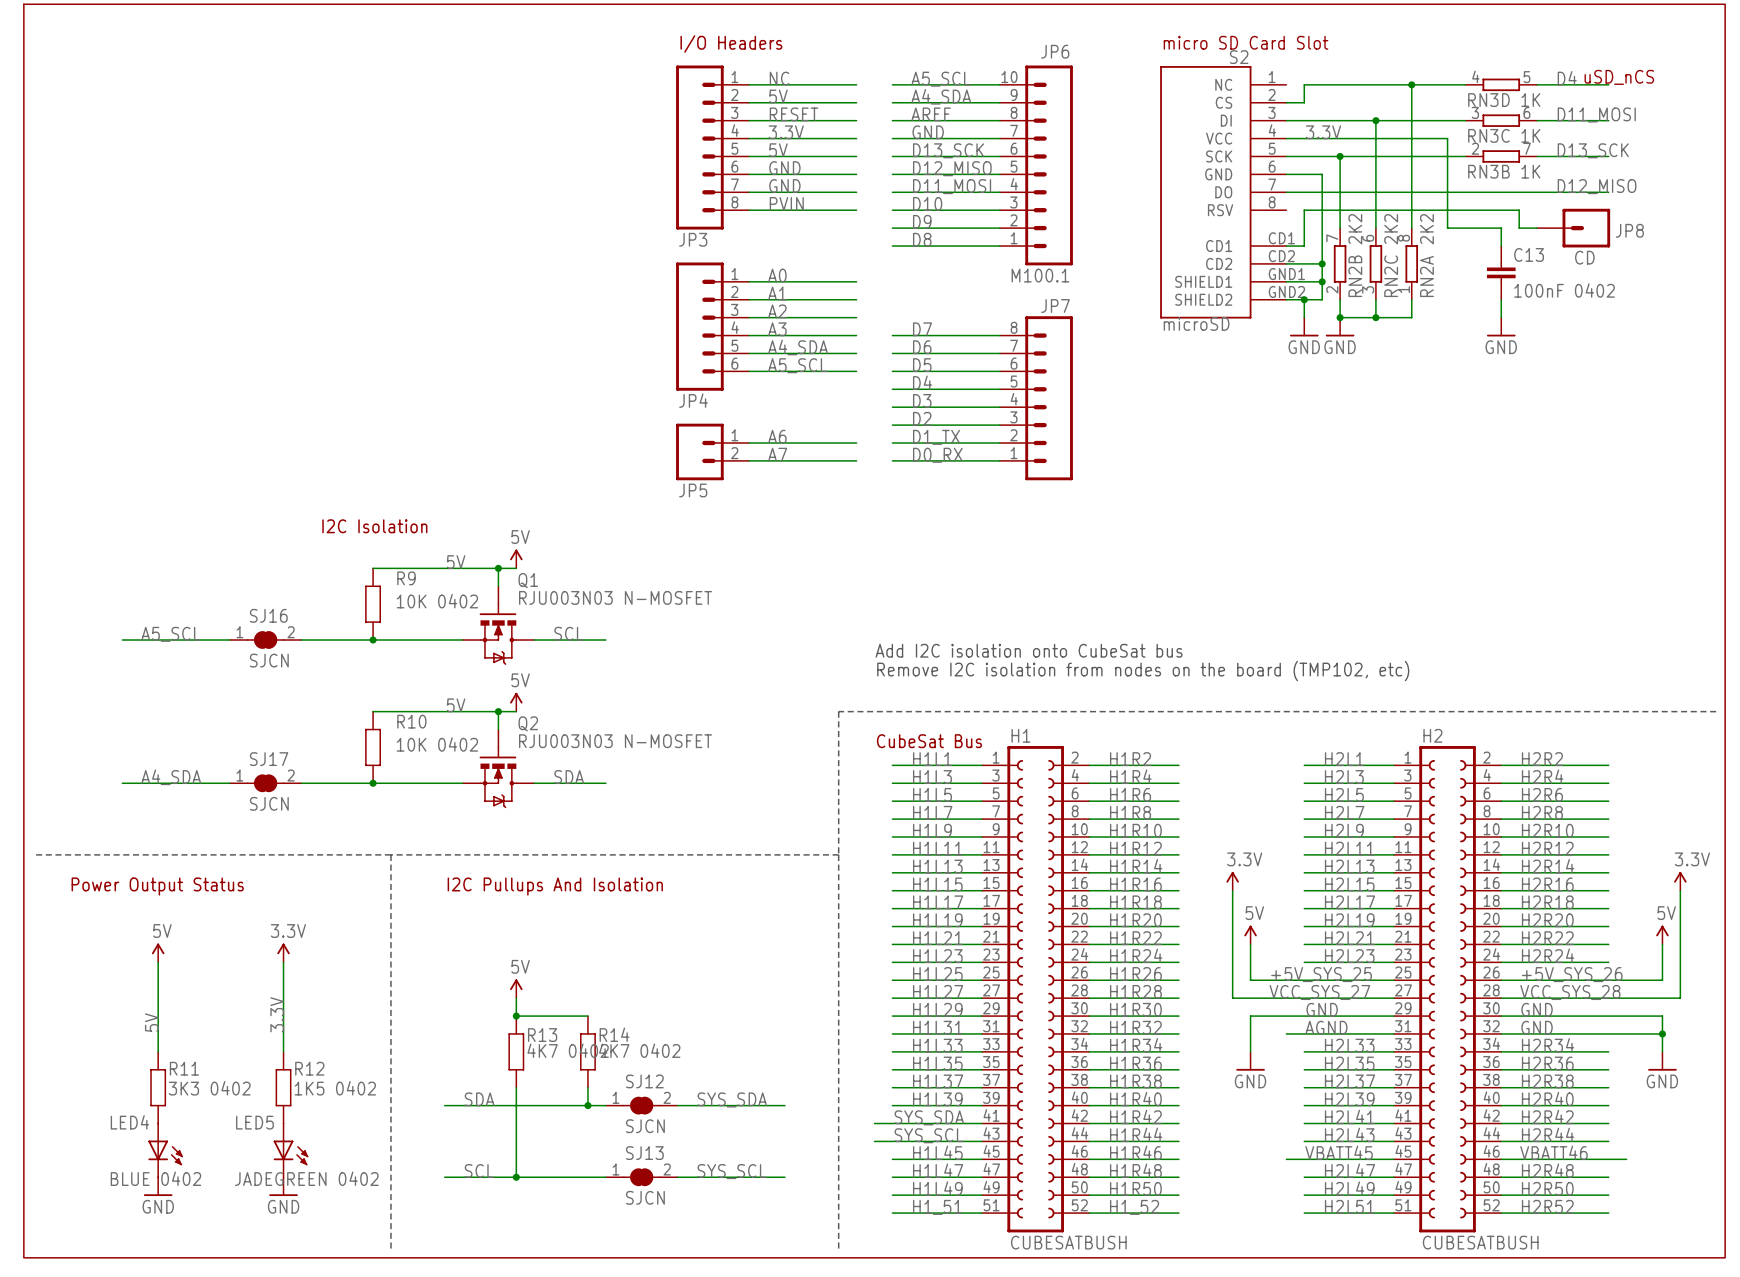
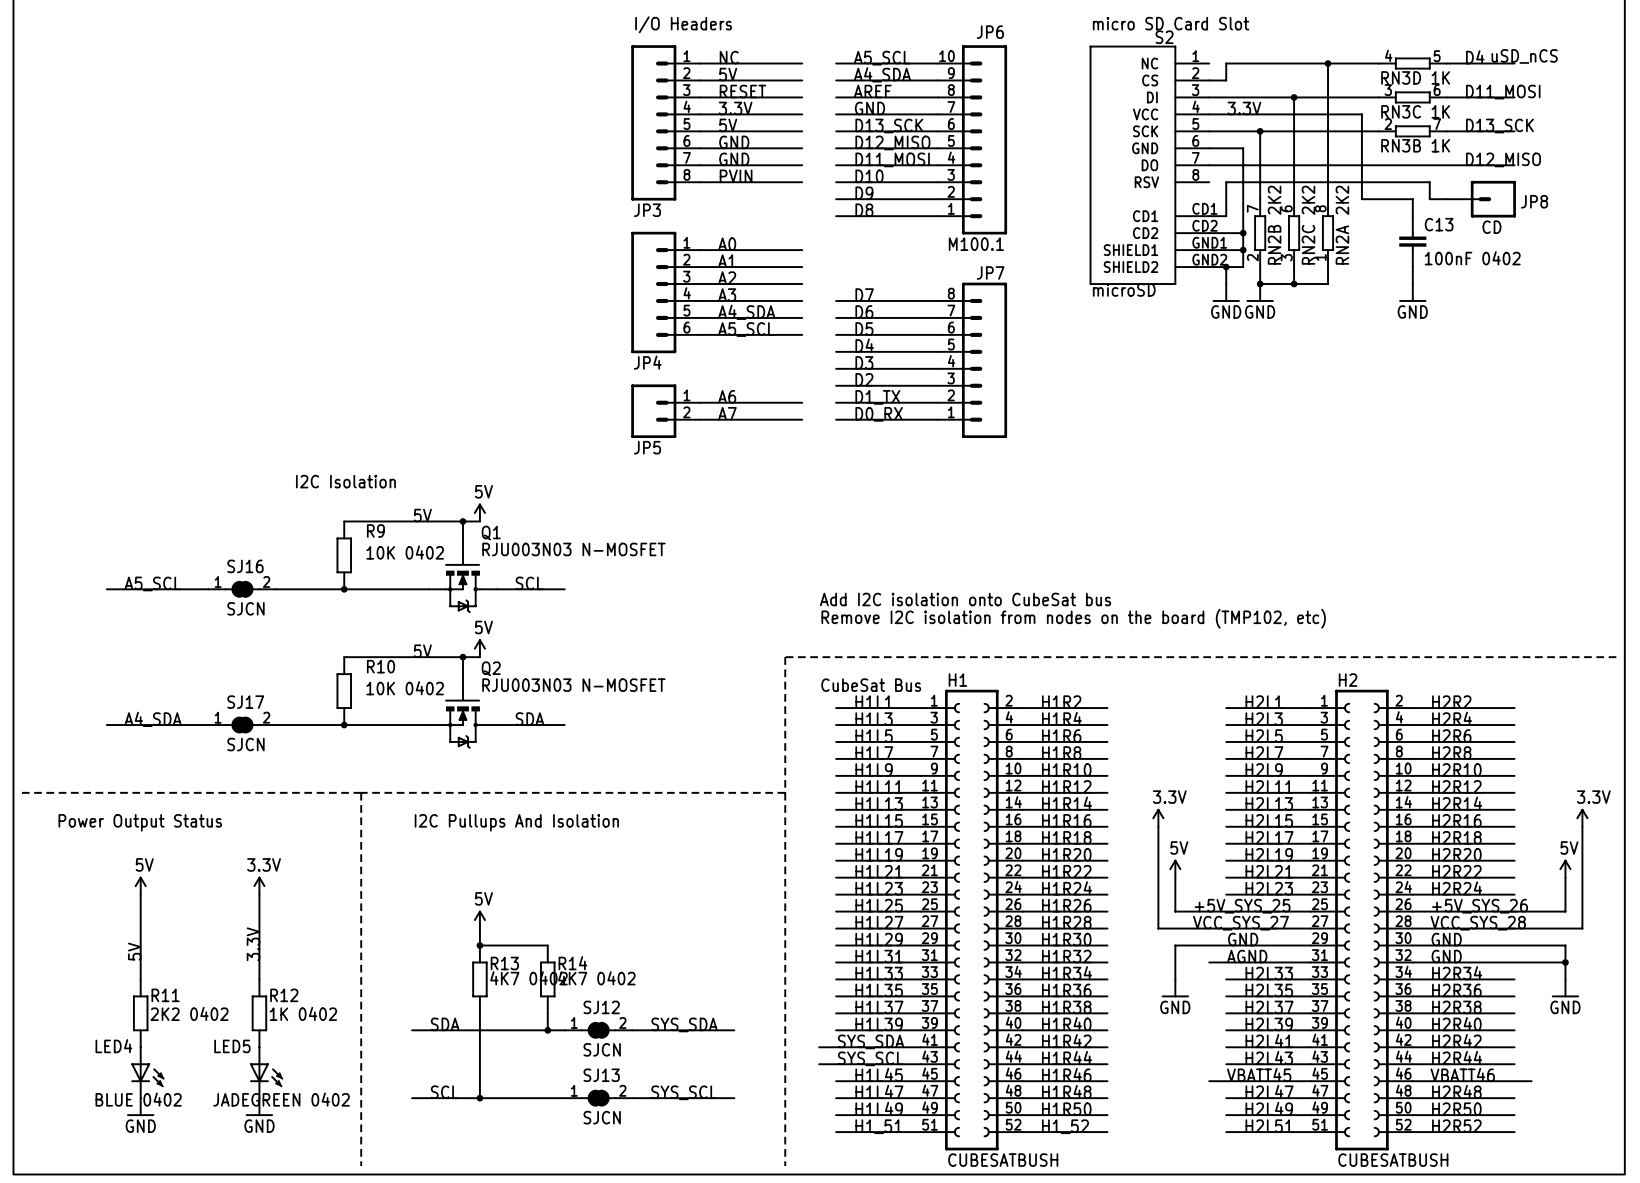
R11 value: 3K3 0402 (209, 1088) -> 2K2 0402 (189, 1013)
R12 value: 1K5 0402 (335, 1088) -> 1K 0402 (303, 1013)

